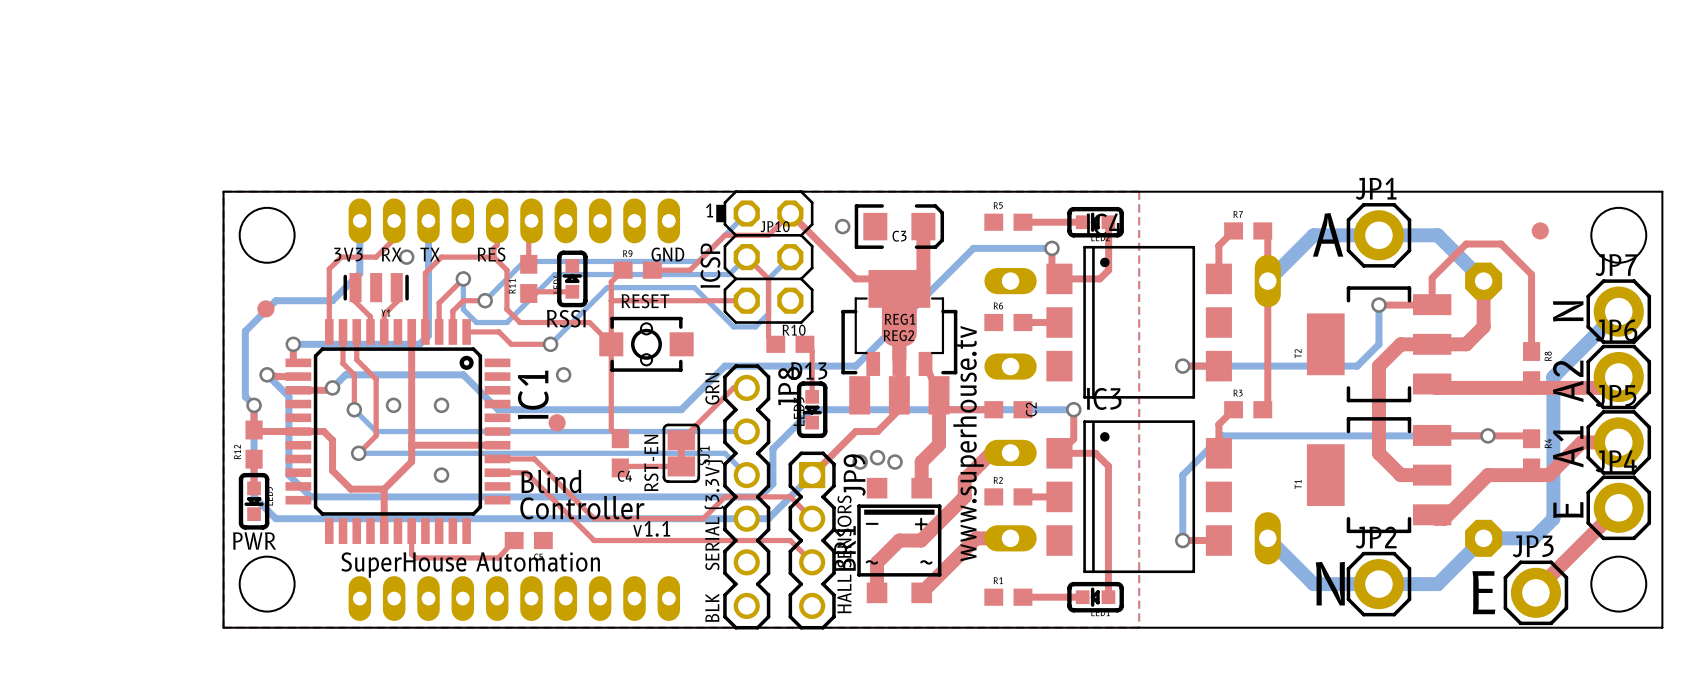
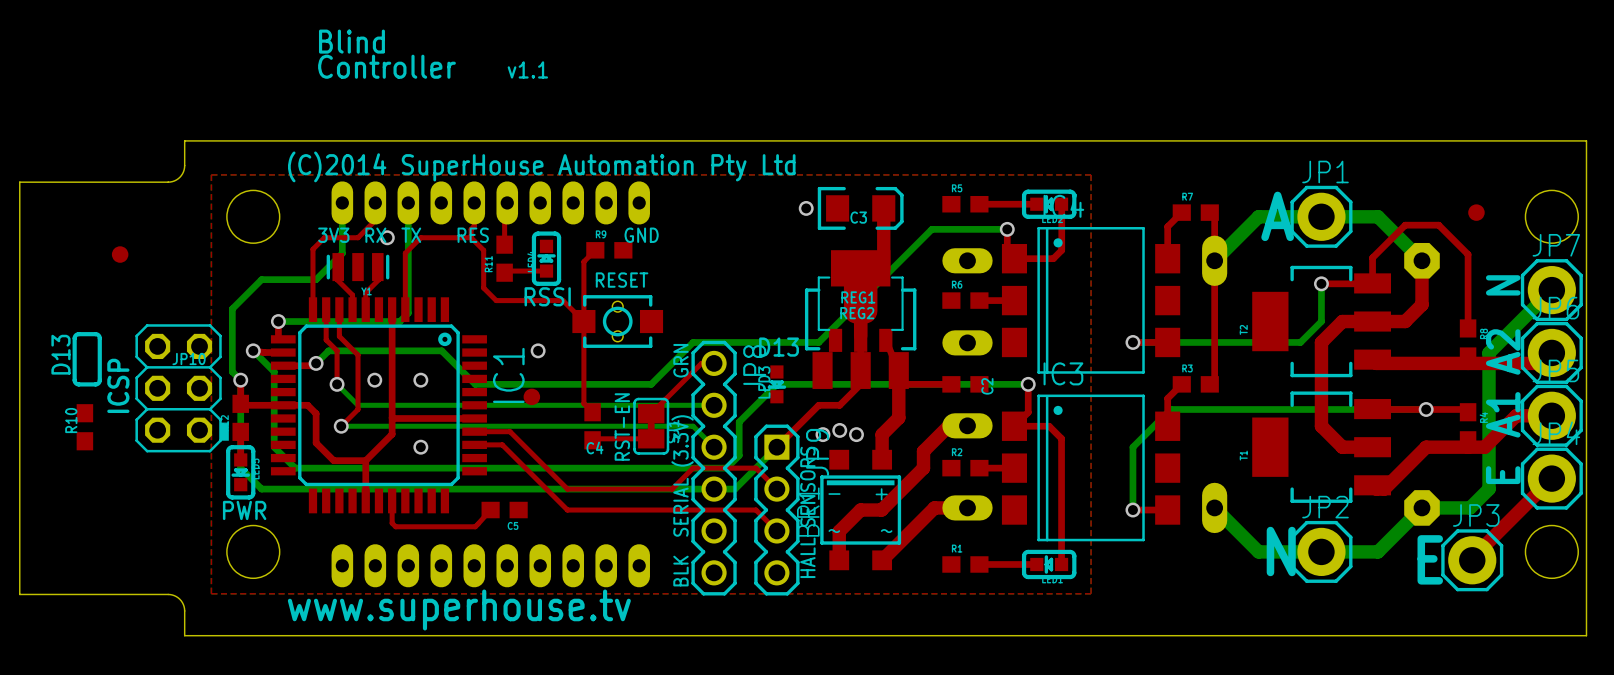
text: none -> Blind (351, 41)
text: none -> Controller (386, 66)
text: none -> v1.1 (527, 69)
text: none -> (C)2014 SuperHouse Automation Pty Ltd (541, 166)
board edge: (223, 191) (1662, 191) (1662, 627) (223, 627) (223, 191) -> (184, 140) (184, 169) (179, 177) (172, 181) (19, 182) (19, 594) (172, 595) (179, 599) (184, 606) (184, 635) (1586, 635) (1586, 140) (184, 140)
drawing: [716, 204, 725, 223] -> none
text: 1 (709, 210) -> none
bottom track: (746, 213) (698, 261) (524, 261) (485, 300) -> none
top track: (746, 257) (768, 278) (768, 337) (775, 344) -> none
bottom track: (746, 257) (729, 274) (554, 274) (506, 322) (476, 322) (463, 309) (463, 278) -> none
JP10 position: (768, 257) -> (178, 388)
bottom track: (790, 257) (768, 278) (768, 313) (755, 326) (733, 326) (694, 287) (607, 287) (550, 344) -> none
text: ICSP (710, 265) -> none
top track: (652, 270) (690, 270) (724, 235) (768, 235) (790, 213) (855, 278) (877, 278) (887, 288) -> none
top track: (463, 278) (439, 303) (439, 331) -> none
via: (463, 278) -> none
top track: (485, 300) (463, 300) (452, 311) (452, 331) -> none
via: (485, 300) -> none
top track: (611, 300) (746, 300) -> none
part position: (265, 308) -> (120, 254)
top track: (466, 331) (498, 331) (511, 344) (550, 344) -> none
via: (550, 344) -> none
R10 rotation: 0° (790, 344) -> 90° clockwise (84, 427)
R10 position: (790, 344) -> (84, 427)
top track: (804, 344) (812, 351) (812, 396) -> none
line: none -> (78, 334) (96, 334) (99, 336) (99, 380) (97, 384) (78, 384) (74, 381) (74, 337) (78, 334)
text: none -> D13 (60, 354)
line: (803, 383) (821, 383) (824, 386) (825, 431) (822, 435) (802, 435) (799, 433) (799, 387) (803, 383) -> none
text: none -> ICSP (118, 385)
text: www.superhouse.tv (968, 443) -> none
drawing: none -> [220, 423, 229, 441]
text: Blind (551, 481) -> none
text: Controller (582, 507) -> none
text: v1.1 (651, 528) -> none
text: SuperHouse Automation (470, 565) -> none
text: none -> www.superhouse.tv (459, 609)

